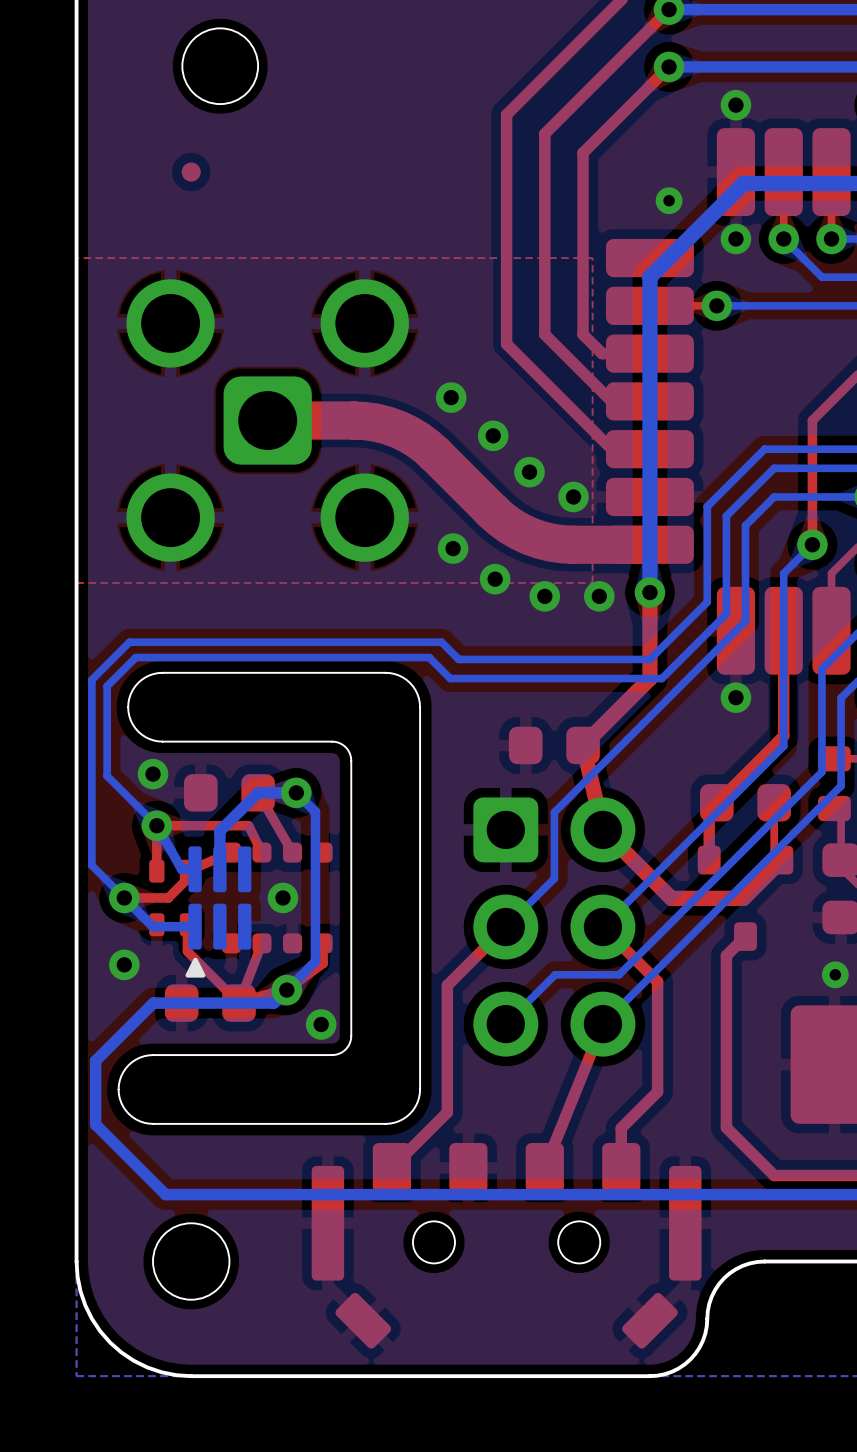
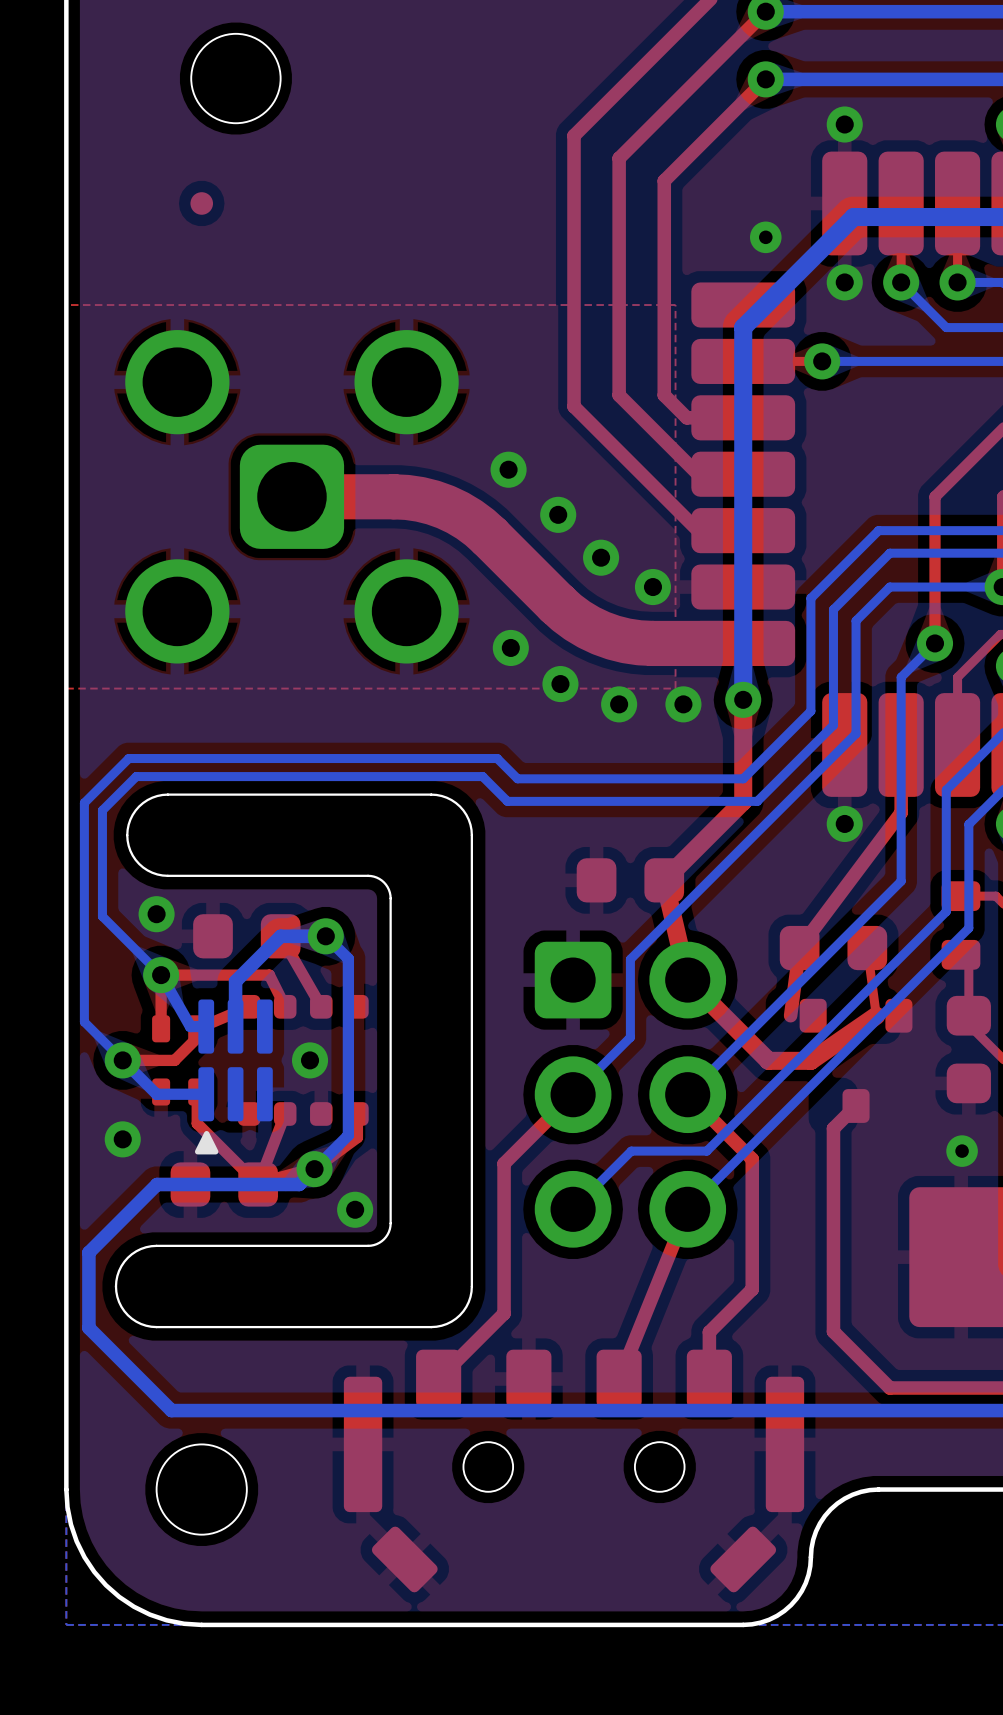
top track: (783, 688) (783, 735) (709, 810) (709, 860) -> (901, 812) (799, 948) (790, 1015)
part position: (745, 802) -> (833, 948)
top track: (774, 802) (774, 852) (781, 860) (743, 898) (707, 898) -> (867, 948) (876, 1015) (810, 1060)

